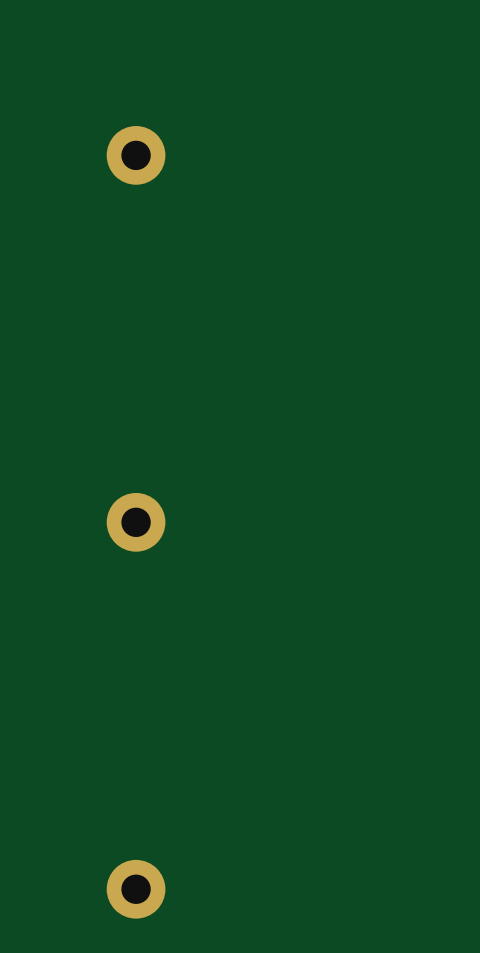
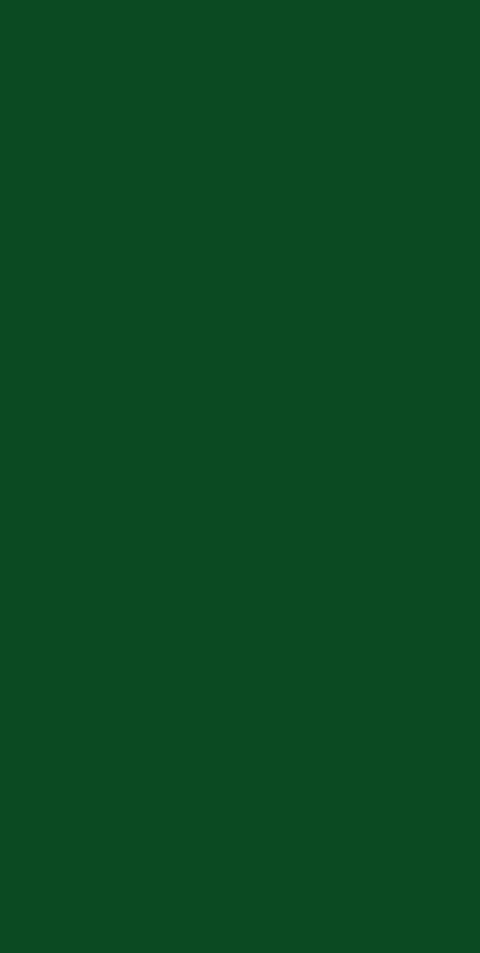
via: (136, 155) -> none
via: (136, 522) -> none
via: (136, 889) -> none

